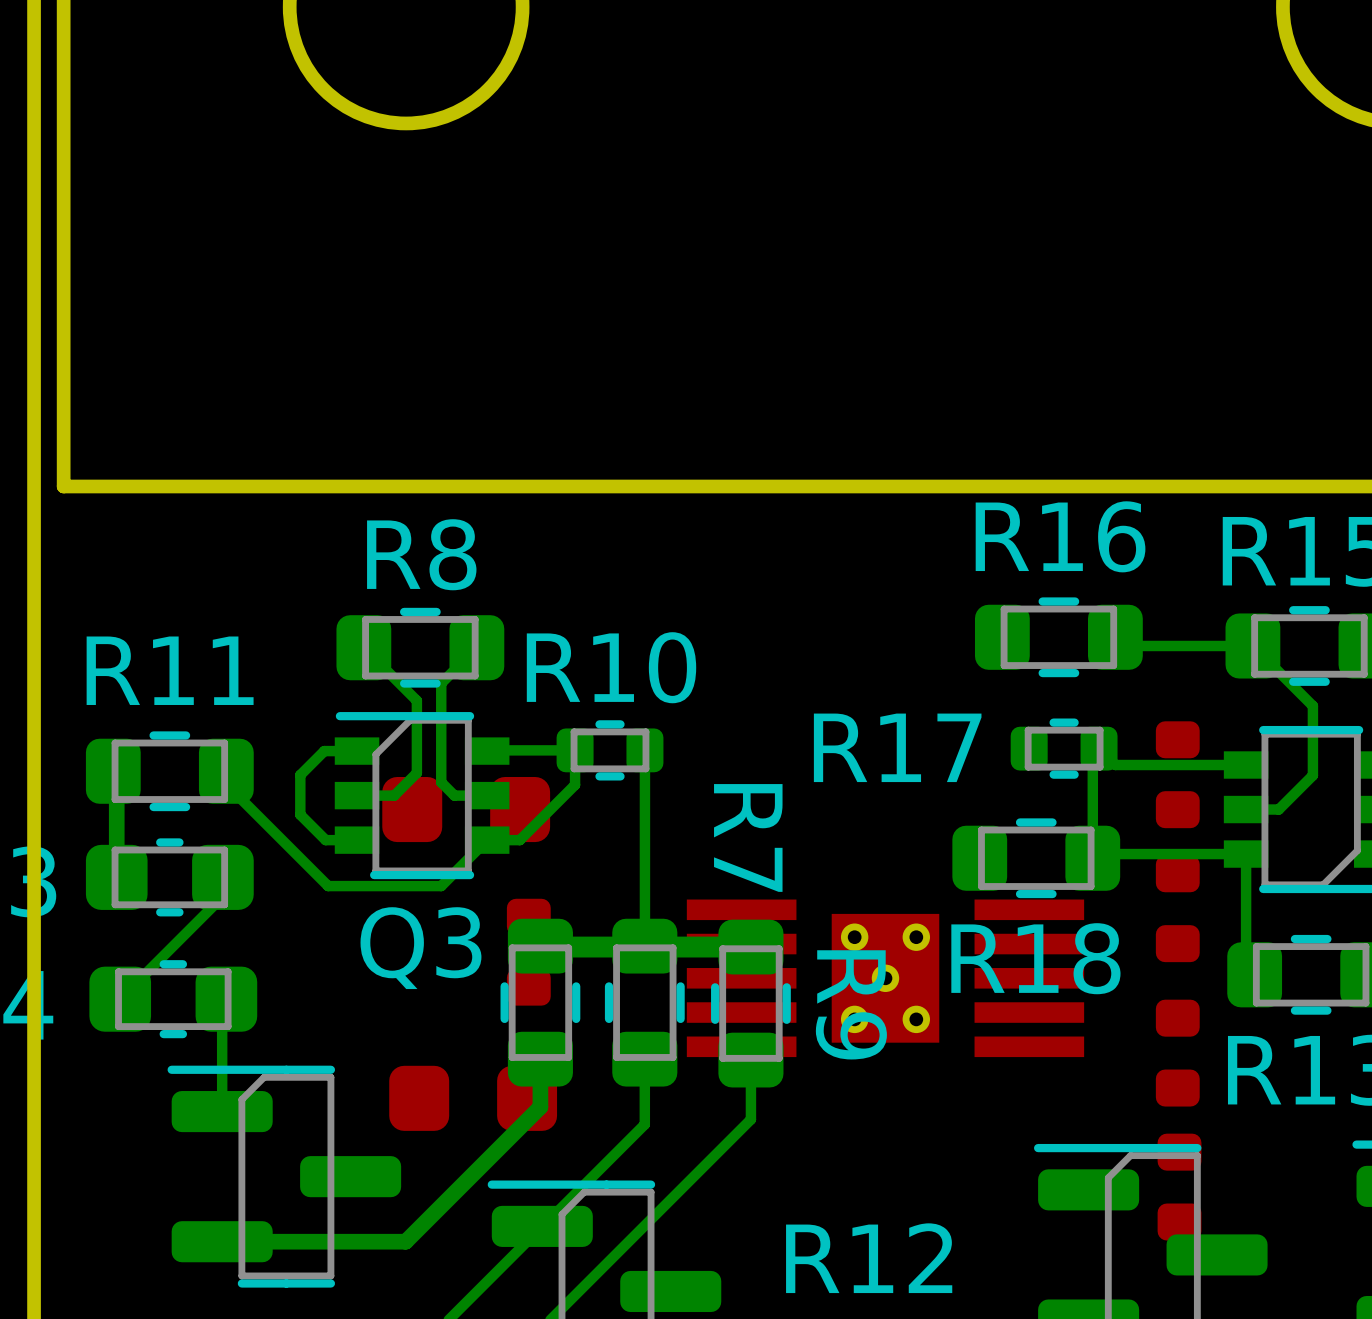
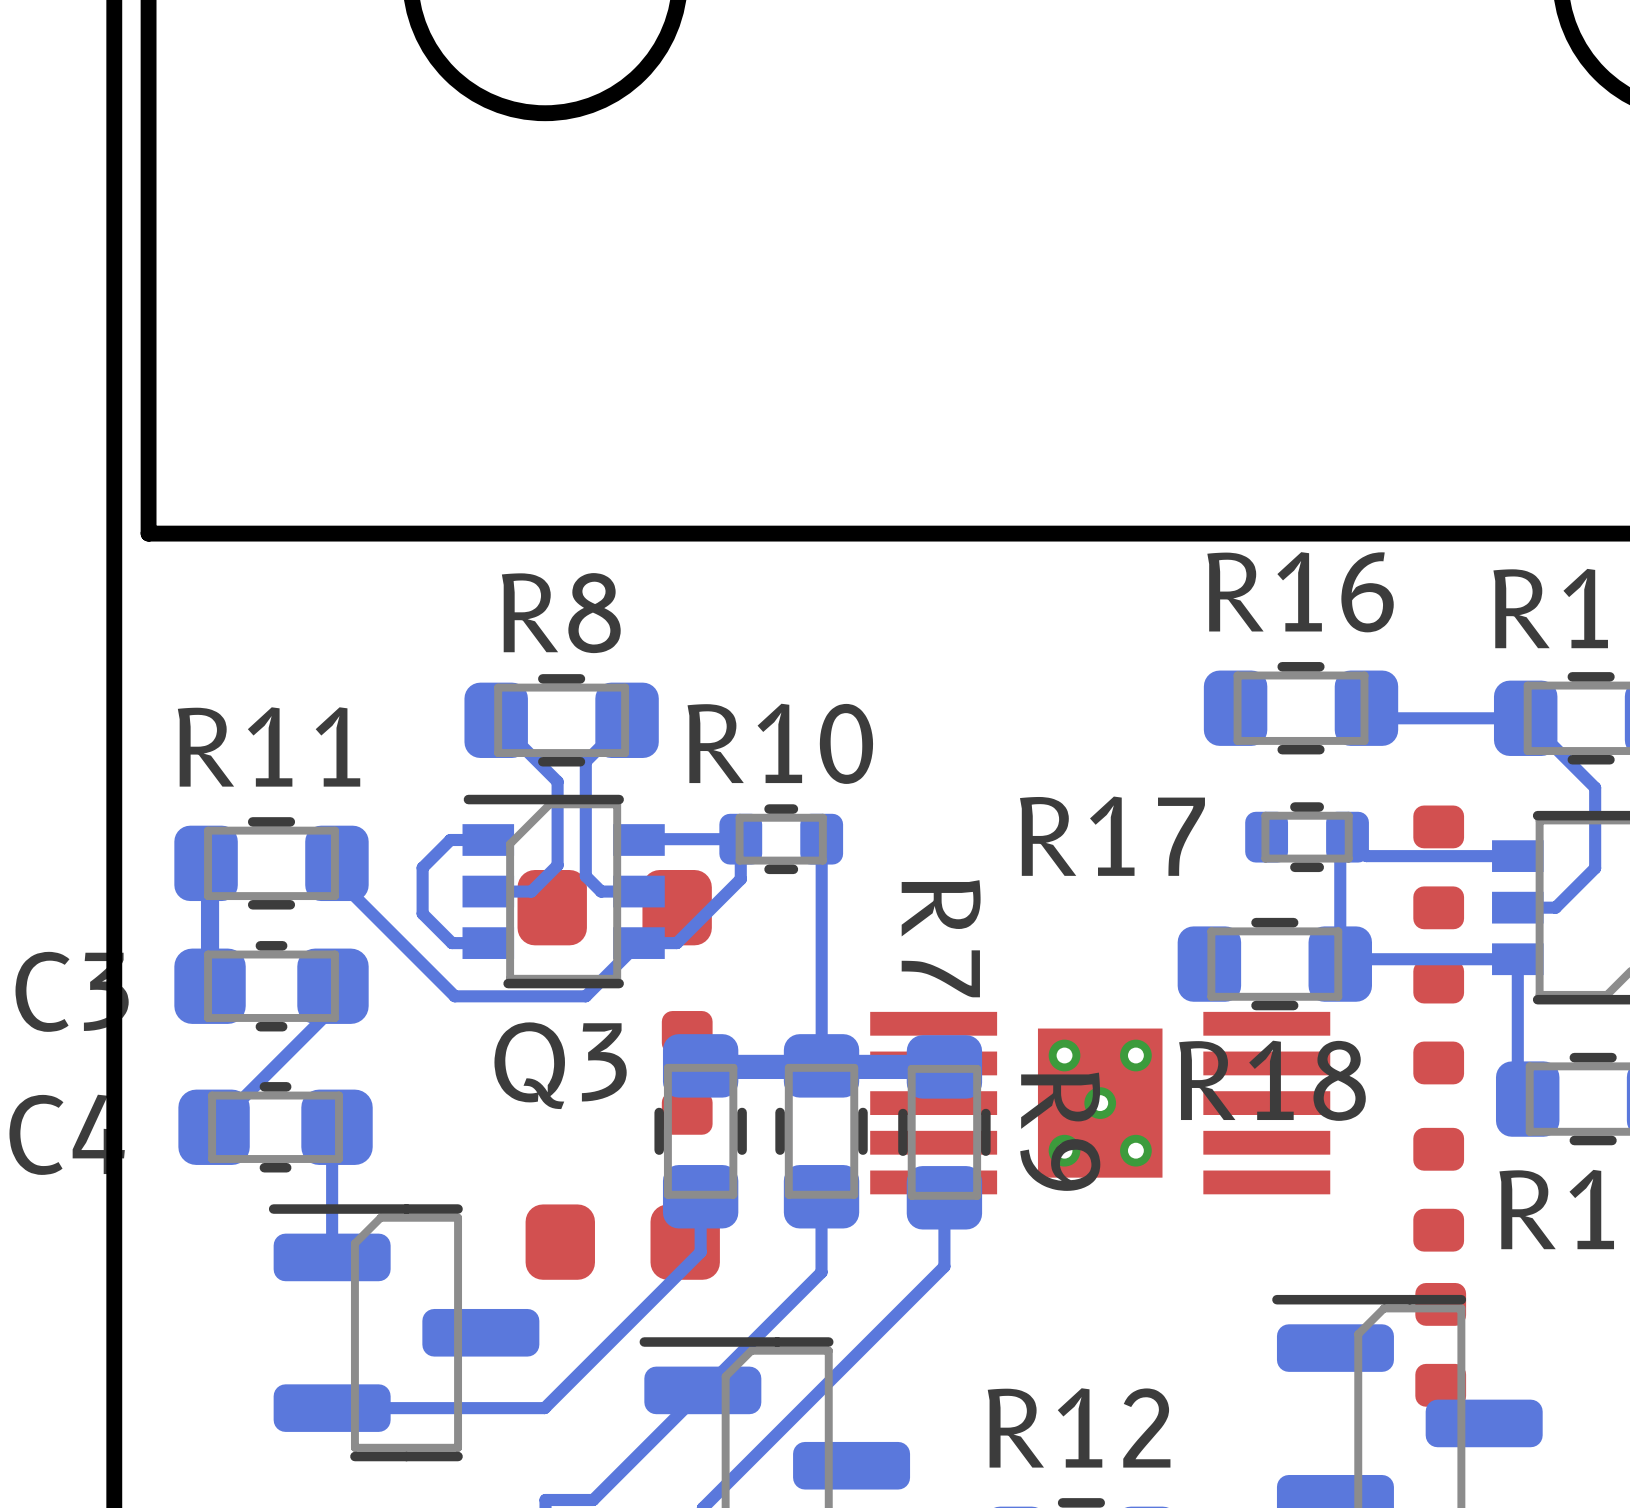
bottom track width: thick (540, 1059) (540, 1107) (405, 1241) (222, 1241) -> thin (700, 1196) (700, 1252) (544, 1408) (332, 1408)

